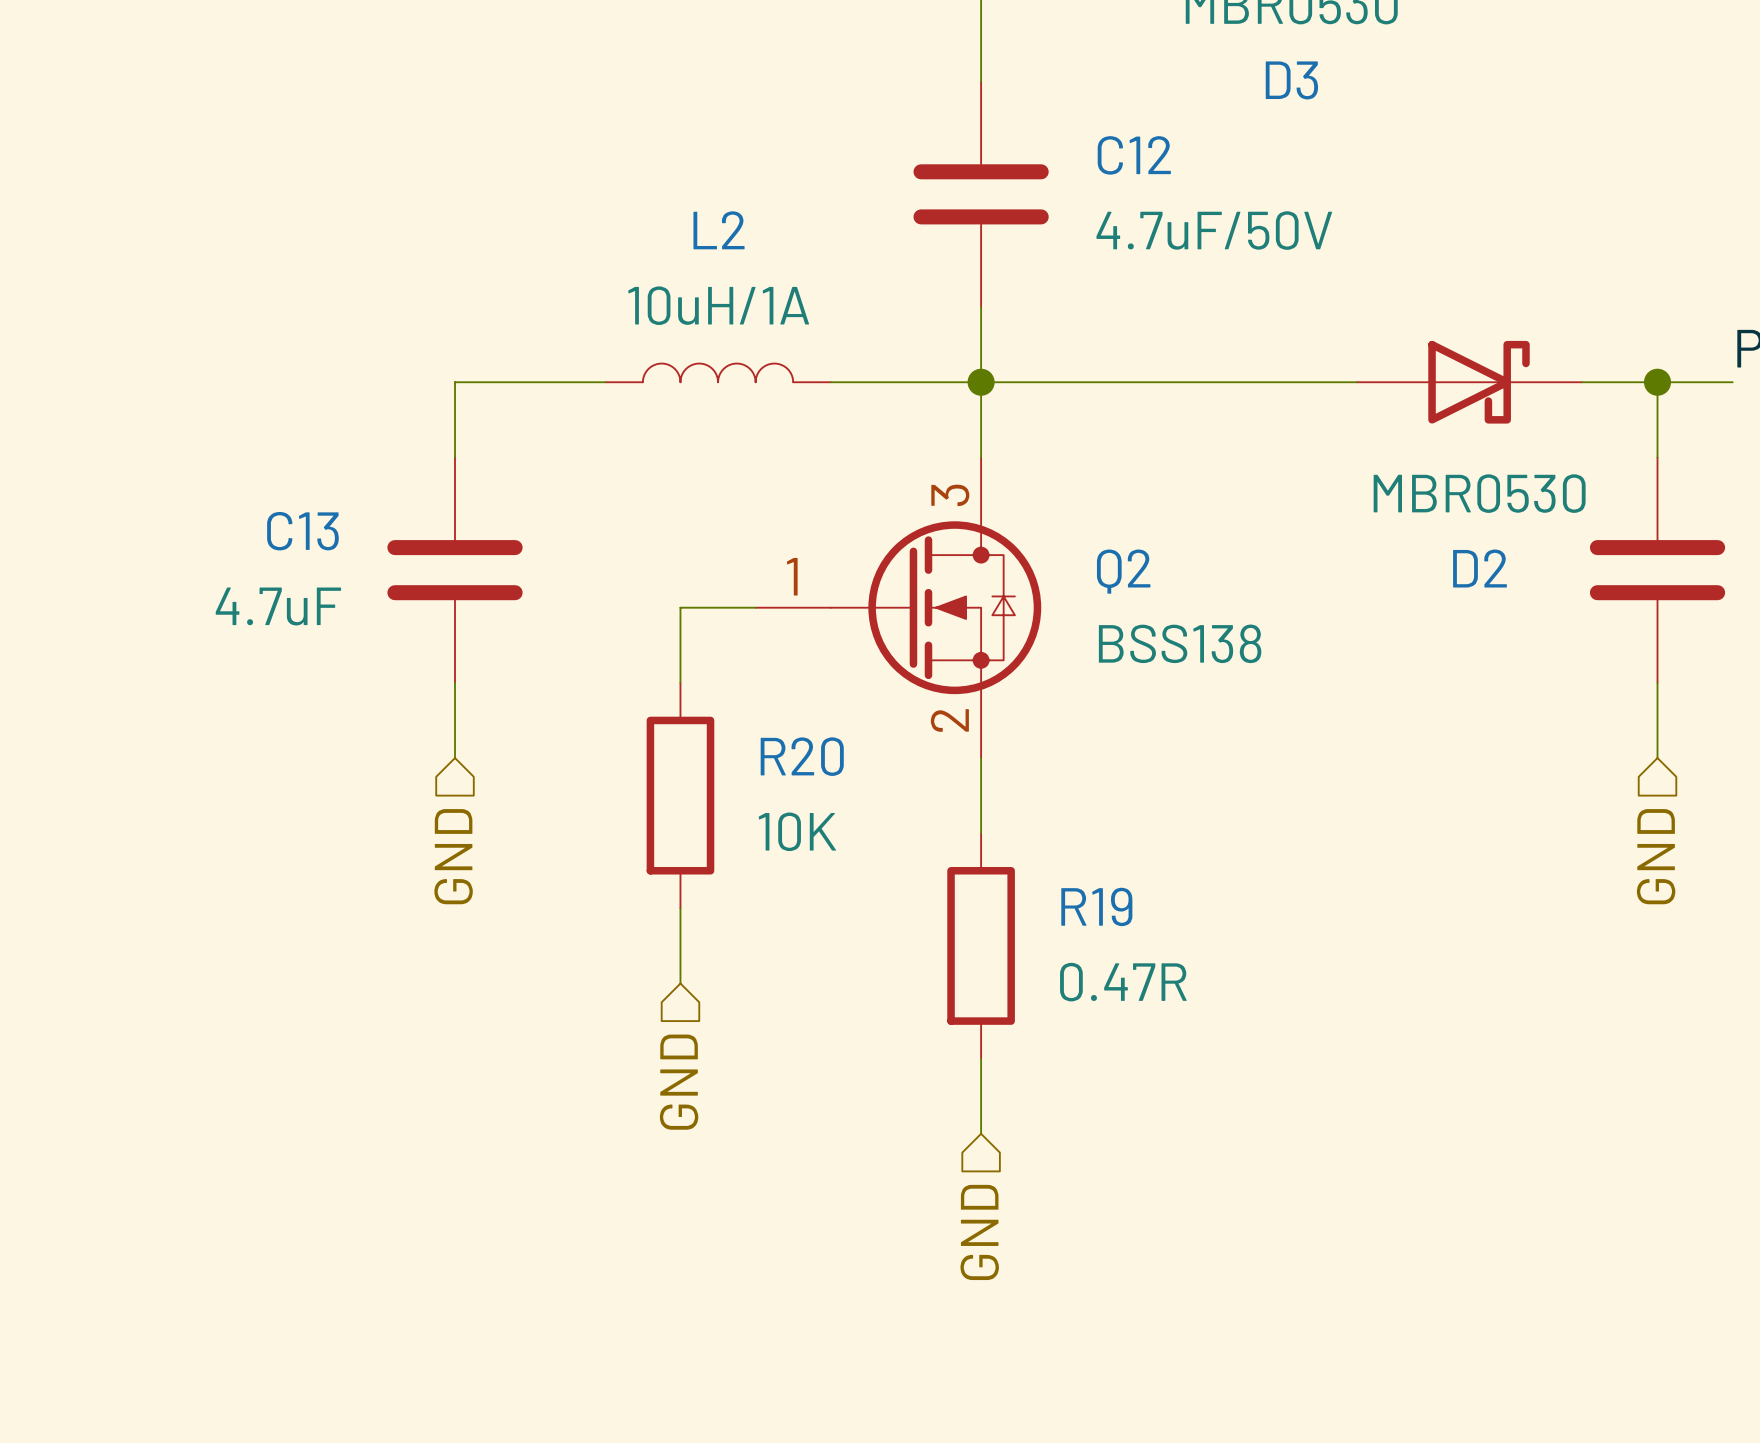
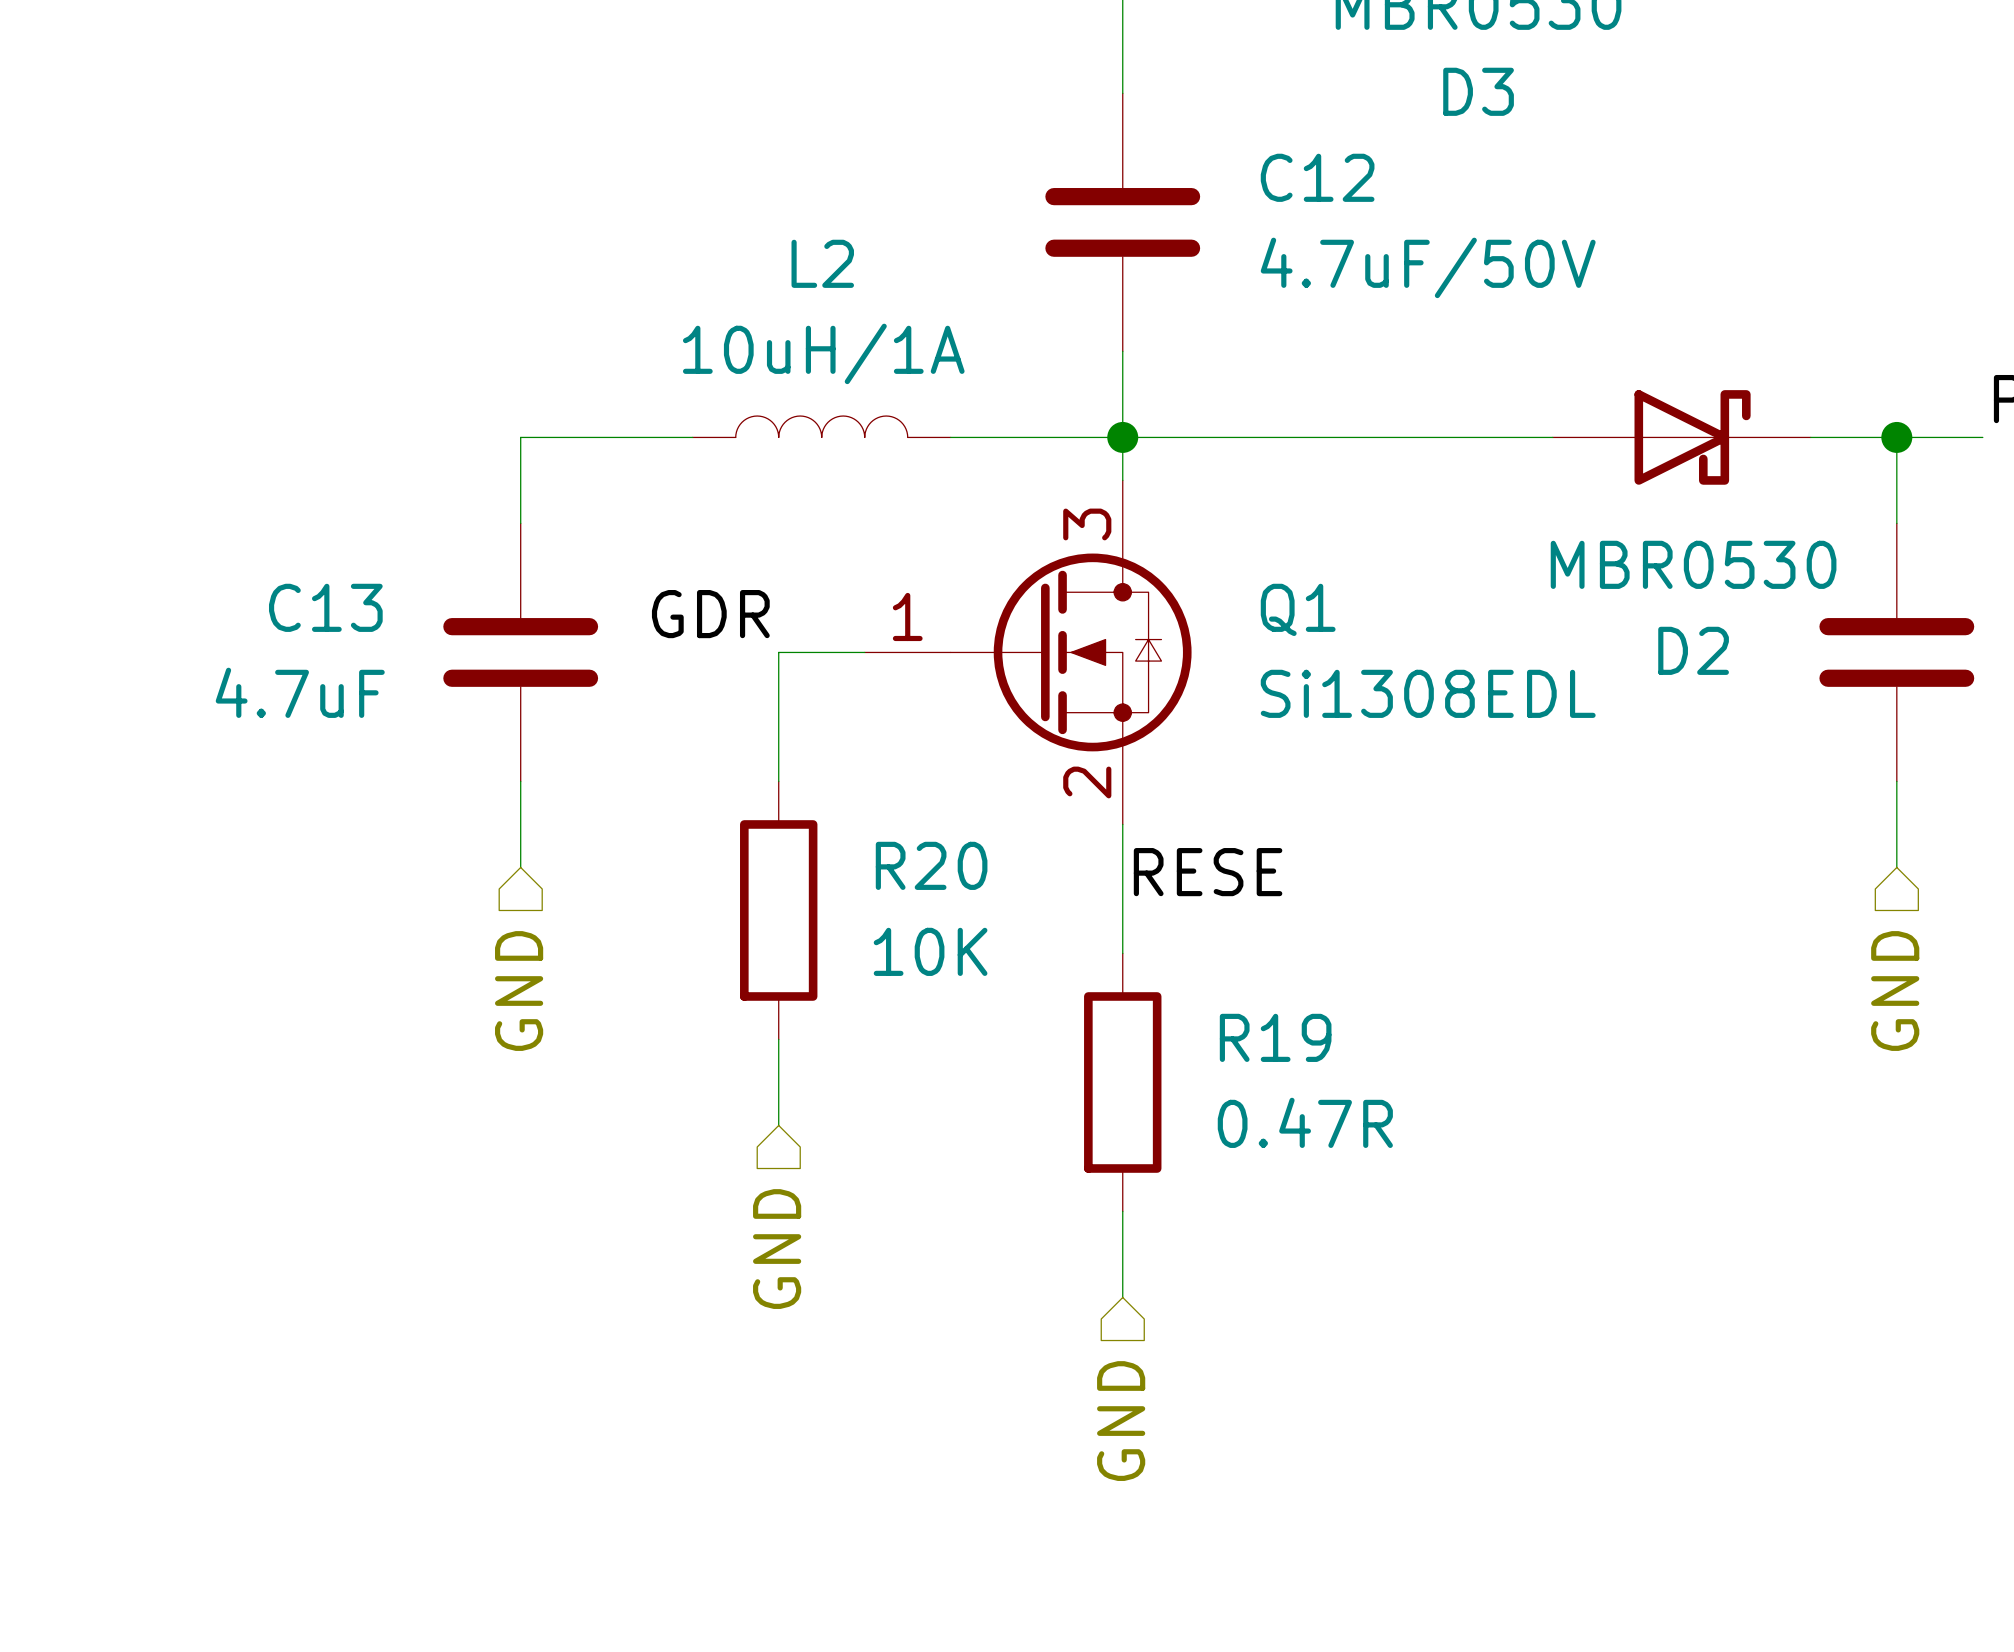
label: none -> GDR (710, 614)
Q1: none -> Si1308EDL (1028, 652)
wire: (680, 607) (755, 607) -> (778, 695) (778, 652) (864, 652)
Q2: BSS138 (898, 607) -> none
label: none -> RESE (1208, 872)

